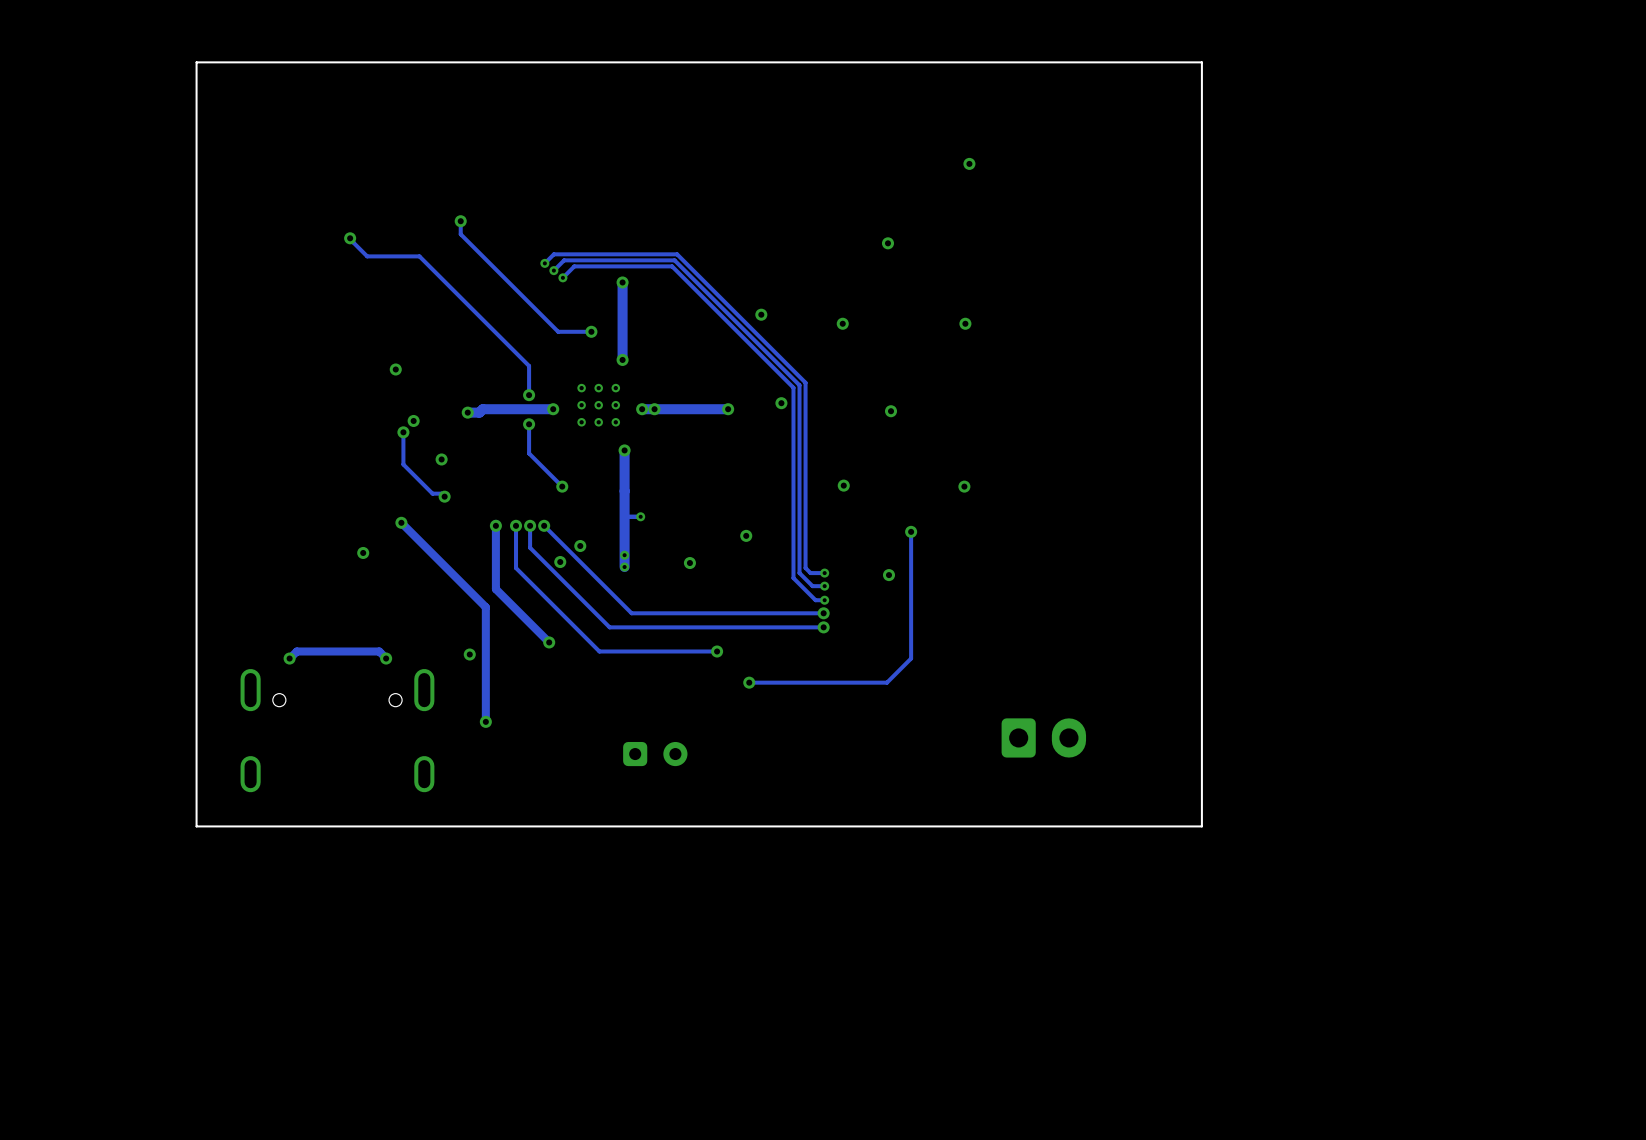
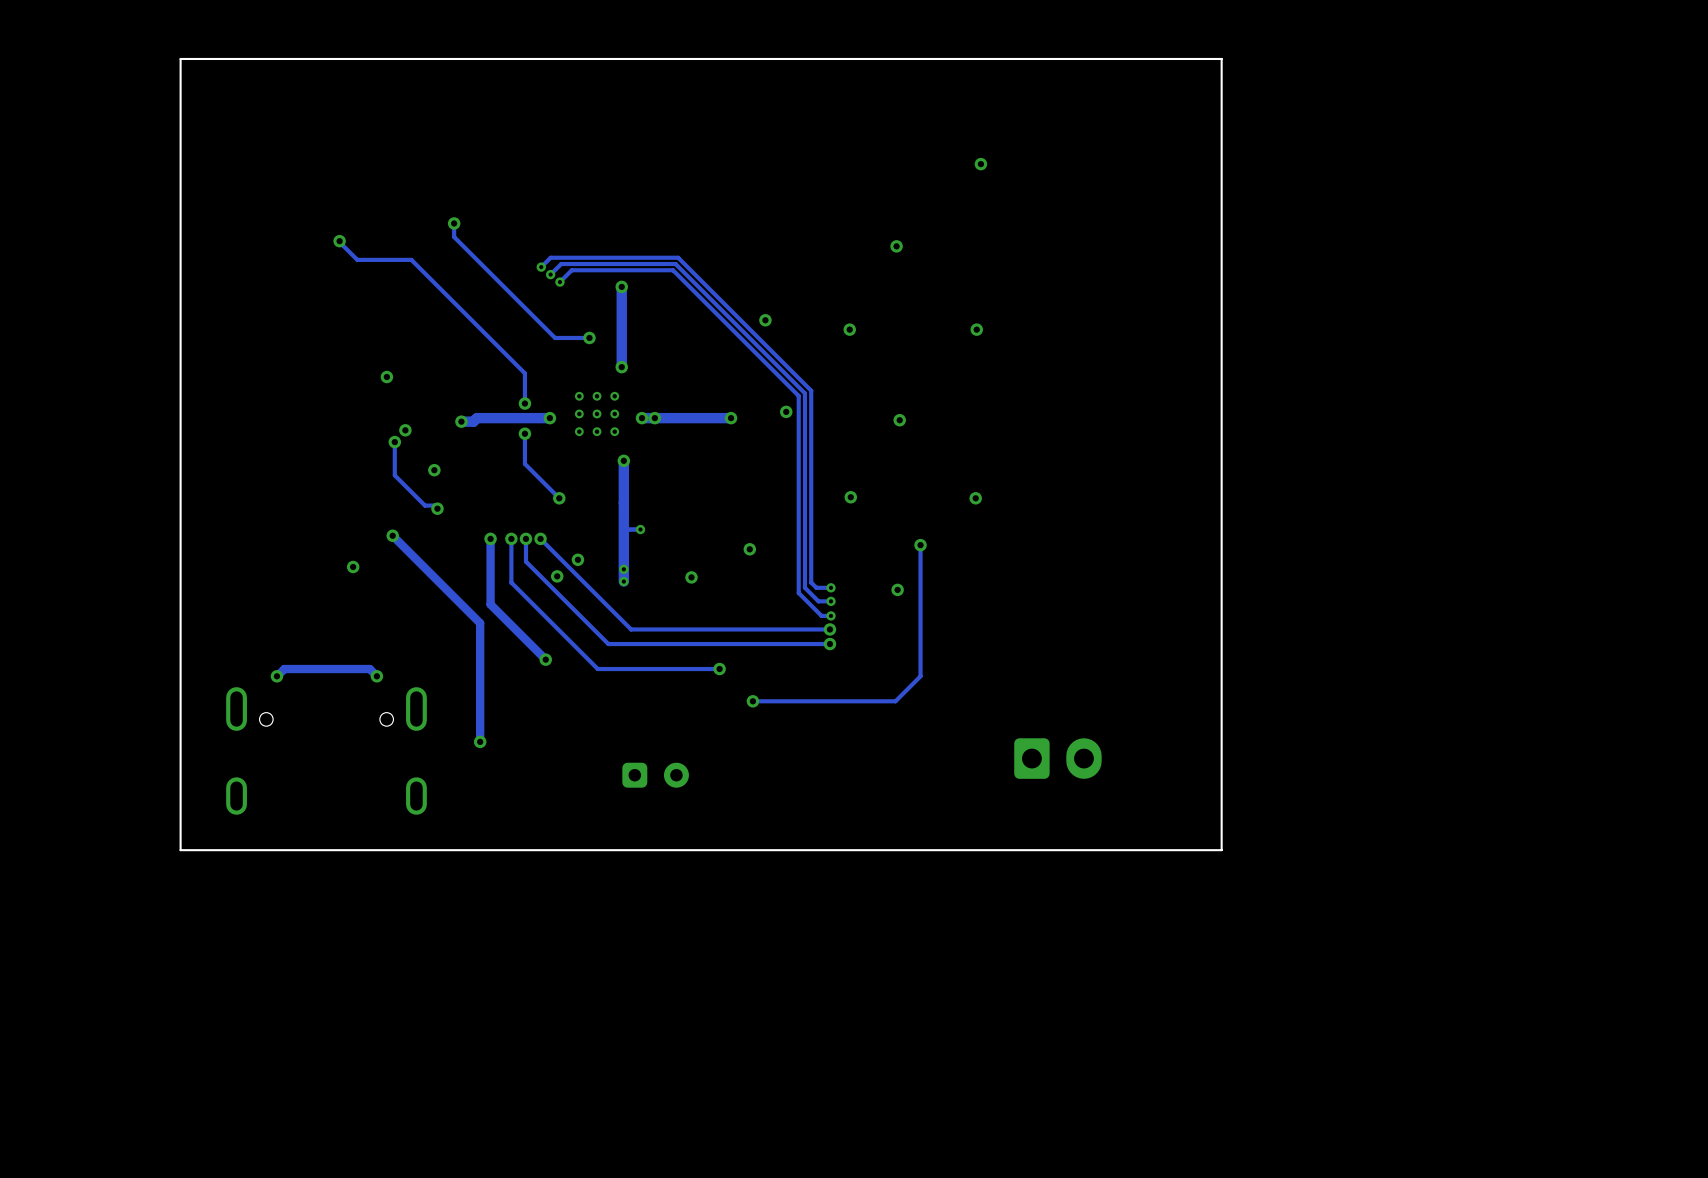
via: (469, 654) -> none

